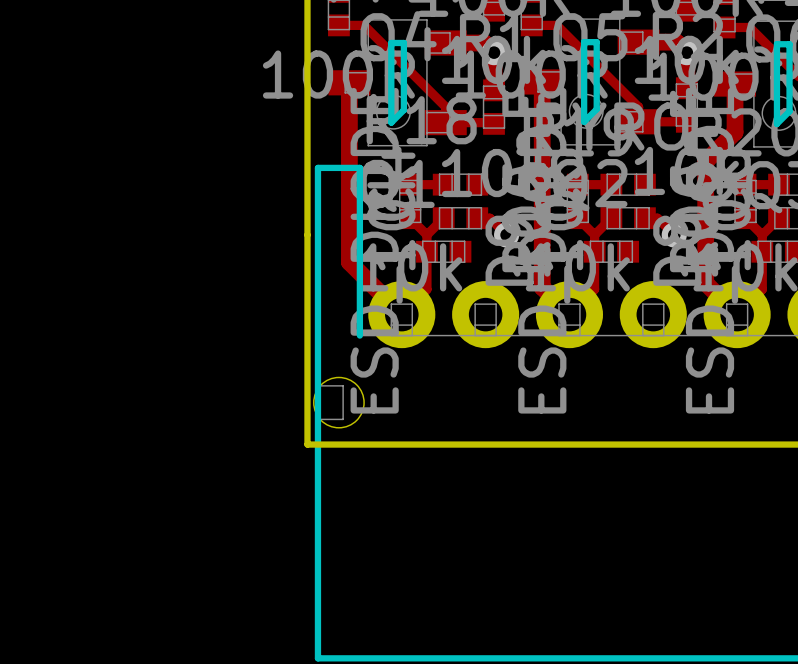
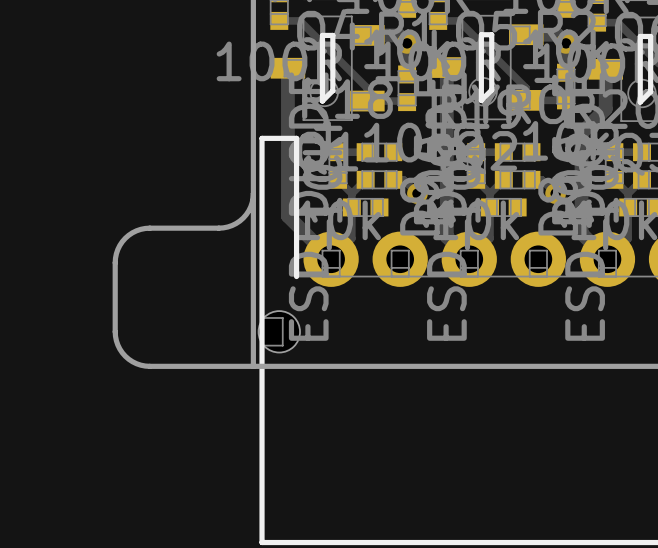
board edge: none -> (253, 193) (248, 210) (236, 223) (218, 228) (140, 229) (128, 235) (122, 241) (117, 249) (115, 262) (115, 336) (119, 349) (128, 359) (136, 363) (149, 366) (253, 366)

